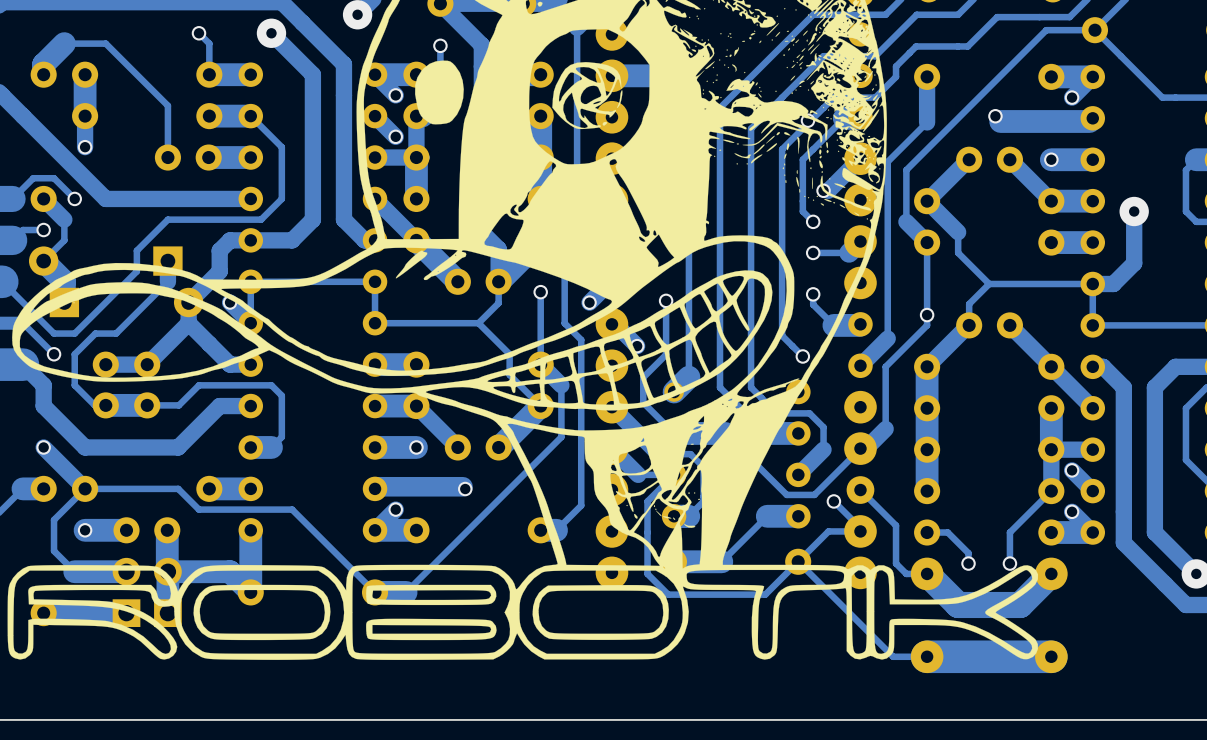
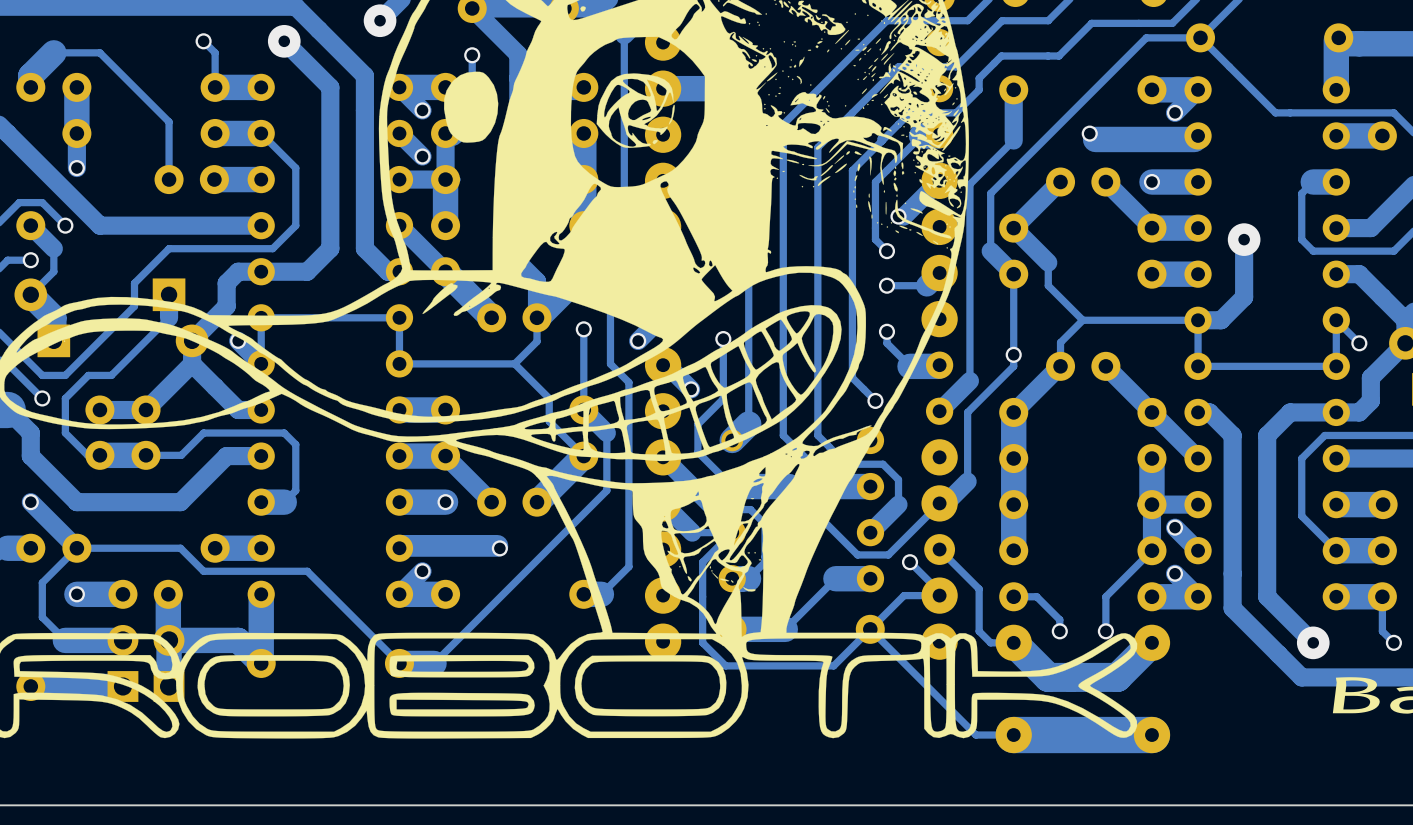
via: (807, 120) -> none

